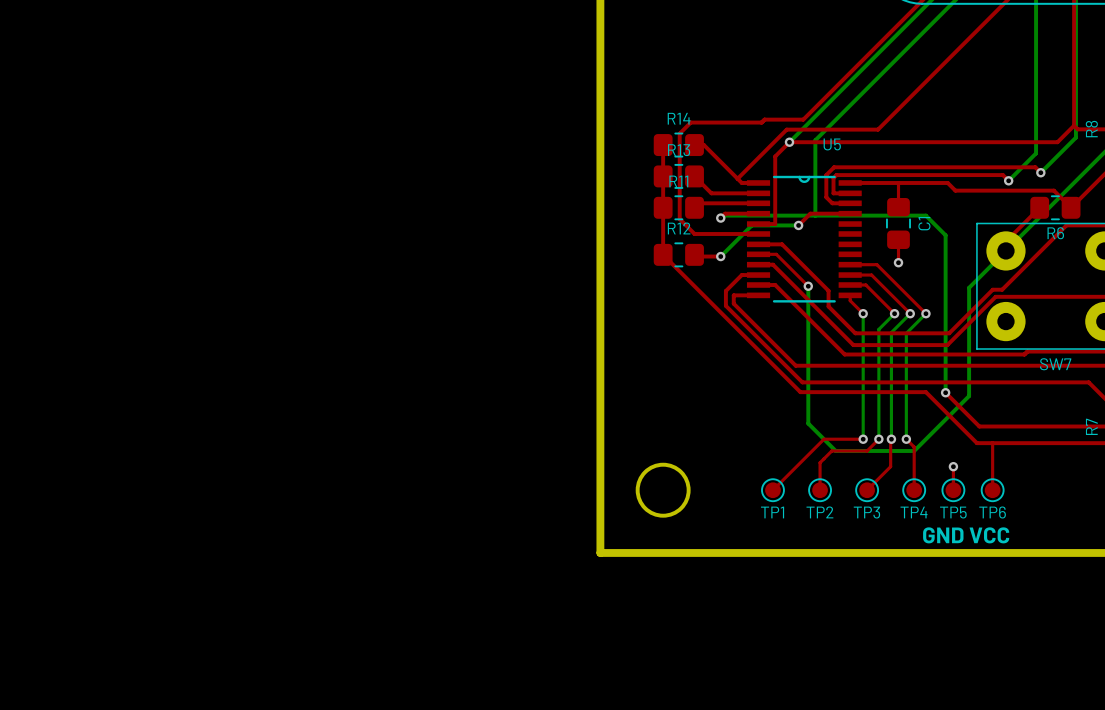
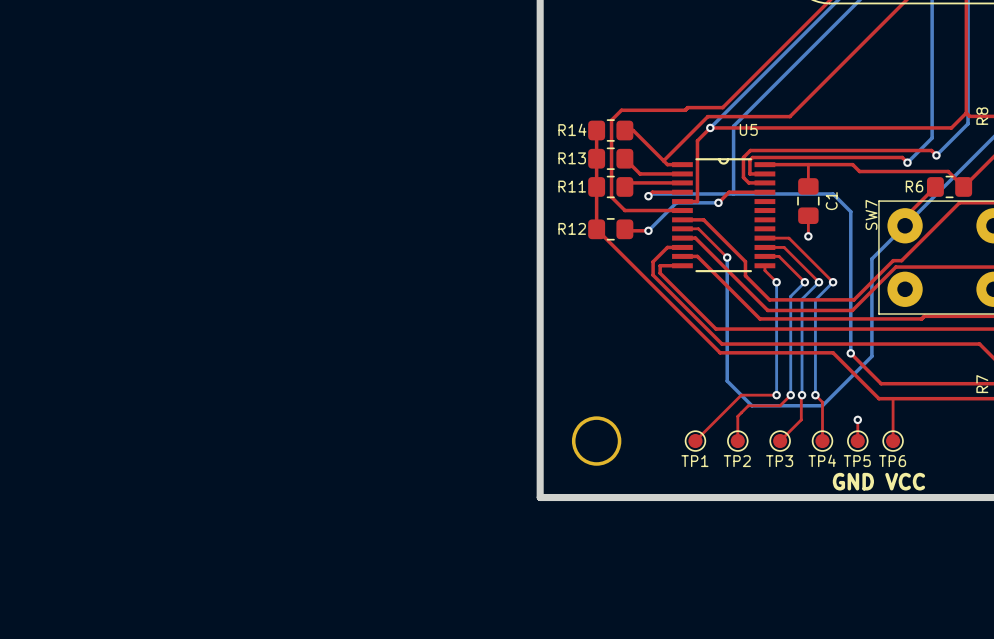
R14 name position: R14 (679, 118) -> R14 (572, 129)
R13 name position: R13 (679, 150) -> R13 (572, 158)
R11 name position: R11 (678, 181) -> R11 (572, 186)
R12 name position: R12 (679, 228) -> R12 (572, 228)
R6 name position: R6 (1055, 233) -> R6 (914, 186)
SW7 name rotation: 0° (1055, 364) -> 90° counterclockwise (871, 214)
SW7 name position: SW7 (1055, 364) -> SW7 (871, 214)

